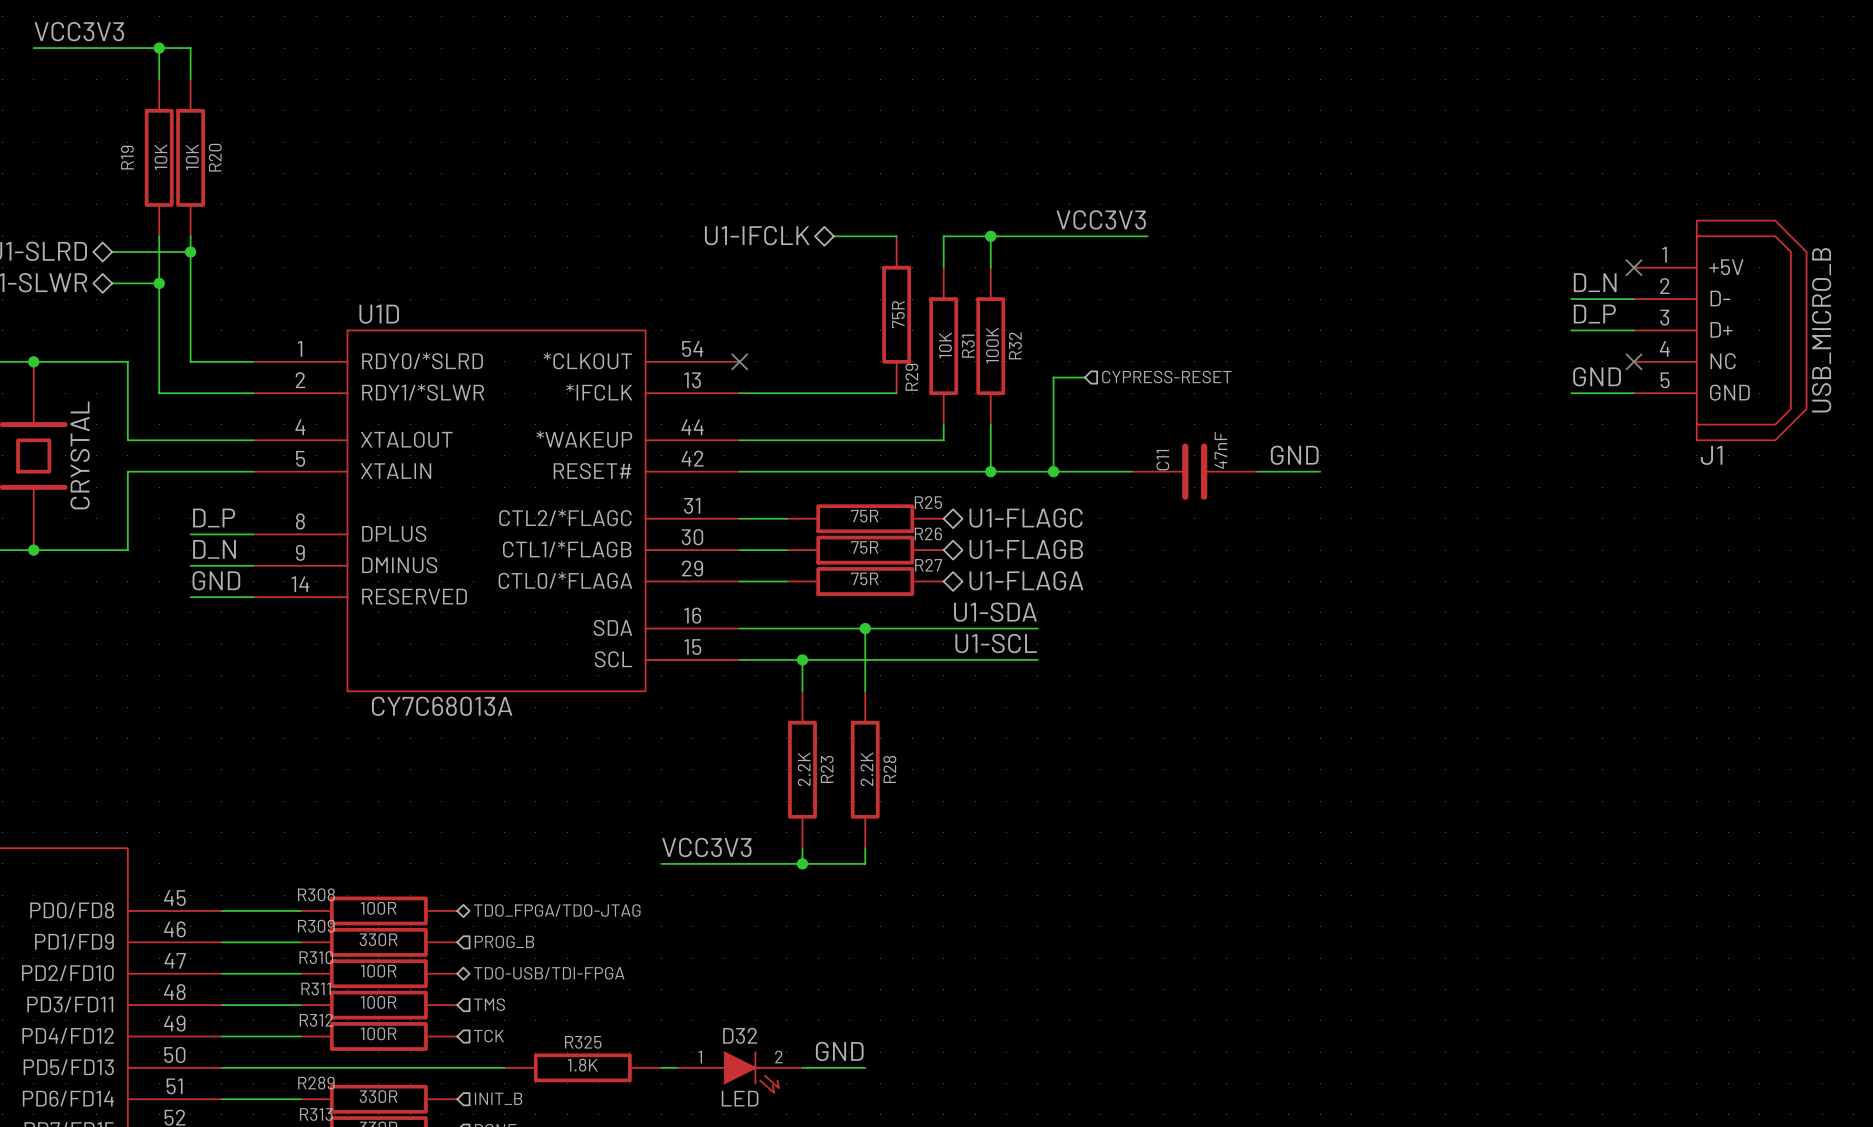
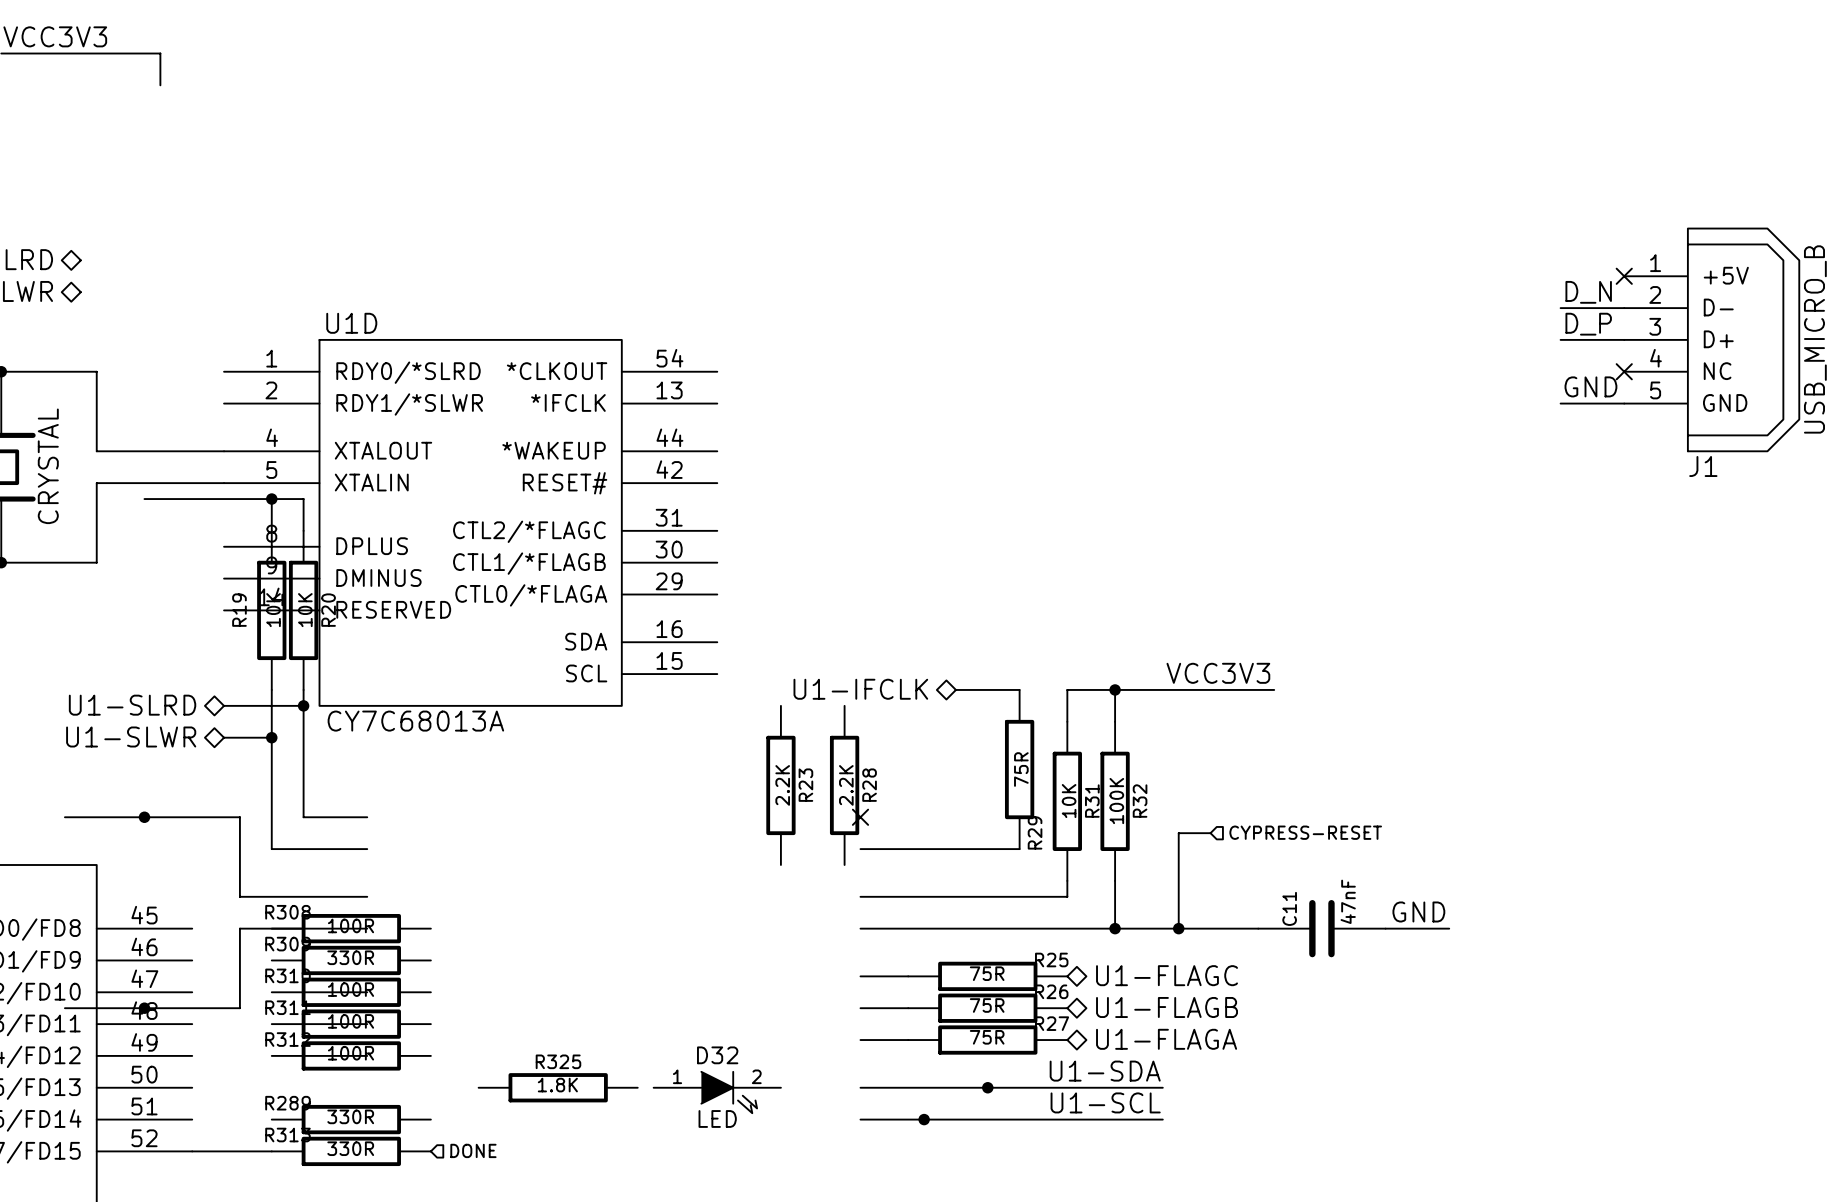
wire: (159, 48) (159, 79) -> none
junction: (159, 48) -> none
R19 position: (159, 157) -> (271, 610)
R20 position: (190, 157) -> (303, 610)
label: VCC3V3 (1101, 219) -> none
hierarchical label: U1-IFCLK (757, 235) -> none
wire: (159, 236) (159, 393) (253, 393) -> none
wire: (190, 236) (190, 361) (253, 361) -> none
wire: (833, 236) (896, 236) -> none
wire: (990, 236) (990, 267) -> none
junction: (990, 236) -> none
wire: (1147, 236) (943, 236) (943, 267) -> none
wire: (112, 252) (190, 252) -> none
junction: (190, 252) -> none
wire: (112, 283) (159, 283) -> none
junction: (159, 283) -> none
R29 position: (896, 314) -> (1019, 769)
R31 position: (943, 346) -> (1067, 801)
R32 position: (990, 346) -> (1115, 801)
no-connect mark: (739, 361) -> none
wire: (1084, 377) (1053, 377) (1053, 471) -> none
hierarchical label: CYPRESS-RESET (1166, 377) -> none
wire: (739, 393) (896, 393) -> none
wire: (943, 424) (943, 440) (739, 440) -> none
wire: (990, 424) (990, 471) -> none
label: GND (1294, 455) -> none
wire: (739, 471) (1131, 471) -> none
junction: (990, 471) -> none
junction: (1053, 471) -> none
C11 position: (1194, 471) -> (1321, 928)
wire: (1257, 471) (1320, 471) -> none
wire: none -> (144, 499) (303, 499) (303, 530)
wire: none -> (271, 499) (271, 530)
junction: none -> (271, 499)
label: D_P (214, 517) -> none
wire: (739, 518) (786, 518) -> none
R25 position: (865, 518) -> (987, 976)
hierarchical label: U1-FLAGC (1026, 518) -> none
wire: (190, 534) (253, 534) -> none
label: D_N (214, 549) -> none
hierarchical label: U1-FLAGB (1026, 549) -> none
wire: (739, 550) (786, 550) -> none
R26 position: (865, 550) -> (987, 1008)
wire: (190, 565) (253, 565) -> none
label: GND (216, 580) -> none
hierarchical label: U1-FLAGA (1026, 580) -> none
wire: (739, 581) (786, 581) -> none
R27 position: (865, 581) -> (987, 1040)
wire: (190, 597) (253, 597) -> none
label: U1-SDA (995, 612) -> none
wire: (739, 628) (1037, 628) -> none
wire: (865, 628) (865, 691) -> none
junction: (865, 628) -> none
label: U1-SCL (996, 643) -> none
wire: (739, 659) (1037, 659) -> none
wire: (802, 659) (802, 691) -> none
junction: (802, 659) -> none
label: none -> VCC3V3 (1218, 673)
hierarchical label: none -> U1-IFCLK (860, 689)
wire: none -> (271, 689) (271, 849) (367, 849)
wire: none -> (303, 689) (303, 817) (367, 817)
wire: none -> (955, 689) (1019, 689)
wire: none -> (1115, 689) (1115, 721)
junction: none -> (1115, 689)
wire: none -> (1274, 689) (1067, 689) (1067, 721)
hierarchical label: none -> U1-SLRD (132, 705)
junction: none -> (303, 705)
hierarchical label: none -> U1-SLWR (131, 736)
wire: none -> (224, 737) (271, 737)
junction: none -> (271, 737)
wire: none -> (64, 817) (239, 817) (239, 896) (367, 896)
junction: none -> (144, 817)
no-connect mark: none -> (860, 817)
wire: none -> (1210, 833) (1178, 833) (1178, 928)
hierarchical label: none -> CYPRESS-RESET (1305, 832)
wire: none -> (860, 849) (1019, 849)
label: VCC3V3 (706, 847) -> none
wire: (802, 848) (802, 863) -> none
wire: (865, 848) (865, 863) (661, 863) -> (1067, 880) (1067, 896) (860, 896)
junction: (802, 863) -> none
wire: none -> (1115, 880) (1115, 928)
label: none -> GND (1418, 911)
wire: (221, 910) (269, 910) -> (64, 1008) (239, 1008) (239, 928)
wire: none -> (271, 928) (367, 928)
hierarchical label: TDO_FPGA/TDO-JTAG (557, 910) -> none
wire: none -> (860, 928) (1258, 928)
junction: none -> (1115, 928)
junction: none -> (1178, 928)
wire: none -> (1385, 928) (1449, 928)
hierarchical label: PROG_B (504, 941) -> none
wire: (221, 942) (300, 942) -> (224, 705) (303, 705)
hierarchical label: none -> U1-FLAGC (1167, 975)
wire: none -> (860, 976) (908, 976)
wire: (221, 973) (300, 973) -> none
wire: none -> (303, 992) (367, 992)
hierarchical label: TDO-USB/TDI-FPGA (549, 973) -> none
hierarchical label: none -> U1-FLAGB (1167, 1007)
junction: none -> (144, 1008)
wire: none -> (860, 1008) (908, 1008)
hierarchical label: TMS (489, 1004) -> none
wire: (221, 1005) (300, 1005) -> none
wire: none -> (303, 1024) (367, 1024)
wire: none -> (860, 1040) (908, 1040)
hierarchical label: none -> U1-FLAGA (1166, 1039)
wire: (221, 1036) (300, 1036) -> none
wire: none -> (303, 1055) (367, 1055)
hierarchical label: TCK (489, 1036) -> none
label: GND (839, 1051) -> none
label: none -> U1-SDA (1105, 1071)
wire: (221, 1067) (504, 1067) -> none
wire: (661, 1067) (676, 1067) -> none
wire: (802, 1067) (865, 1067) -> none
wire: none -> (860, 1087) (1162, 1087)
junction: none -> (987, 1087)
label: none -> U1-SCL (1105, 1102)
hierarchical label: INIT_B (498, 1098) -> none
wire: (221, 1099) (300, 1099) -> none
wire: none -> (860, 1119) (1162, 1119)
junction: none -> (924, 1119)

